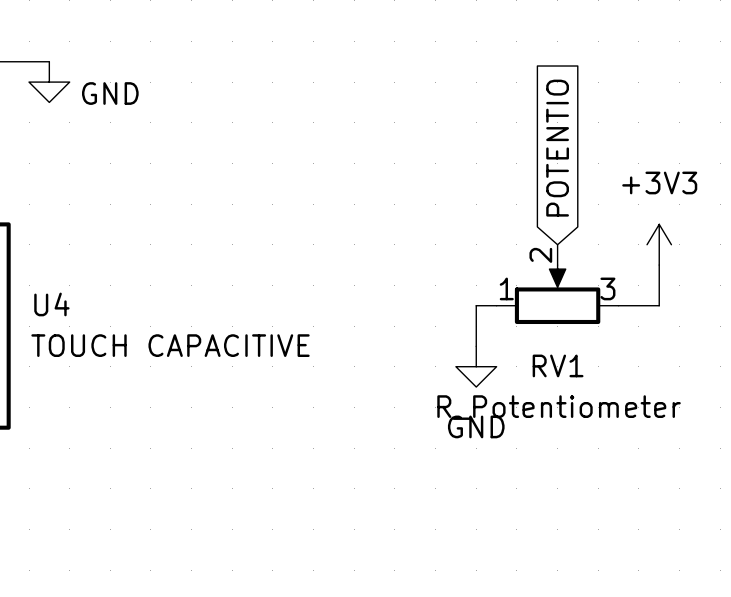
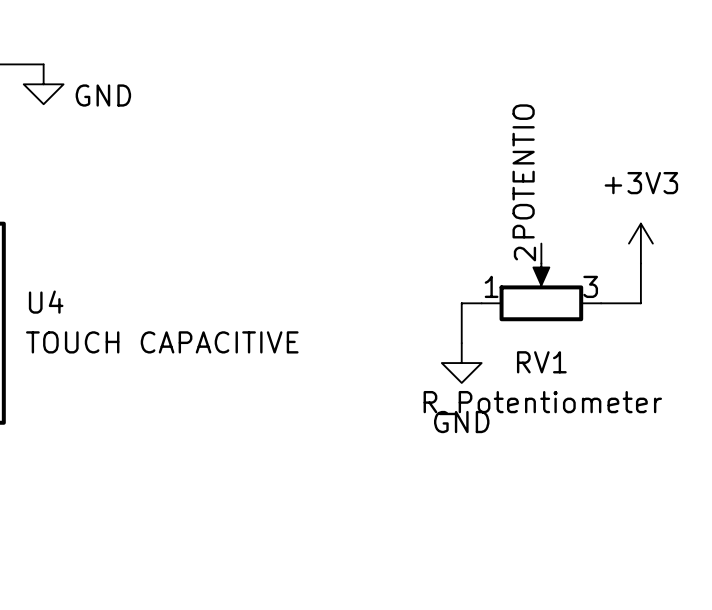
global label: POTENTIO (557, 148) -> none
label: none -> POTENTIO (523, 171)

